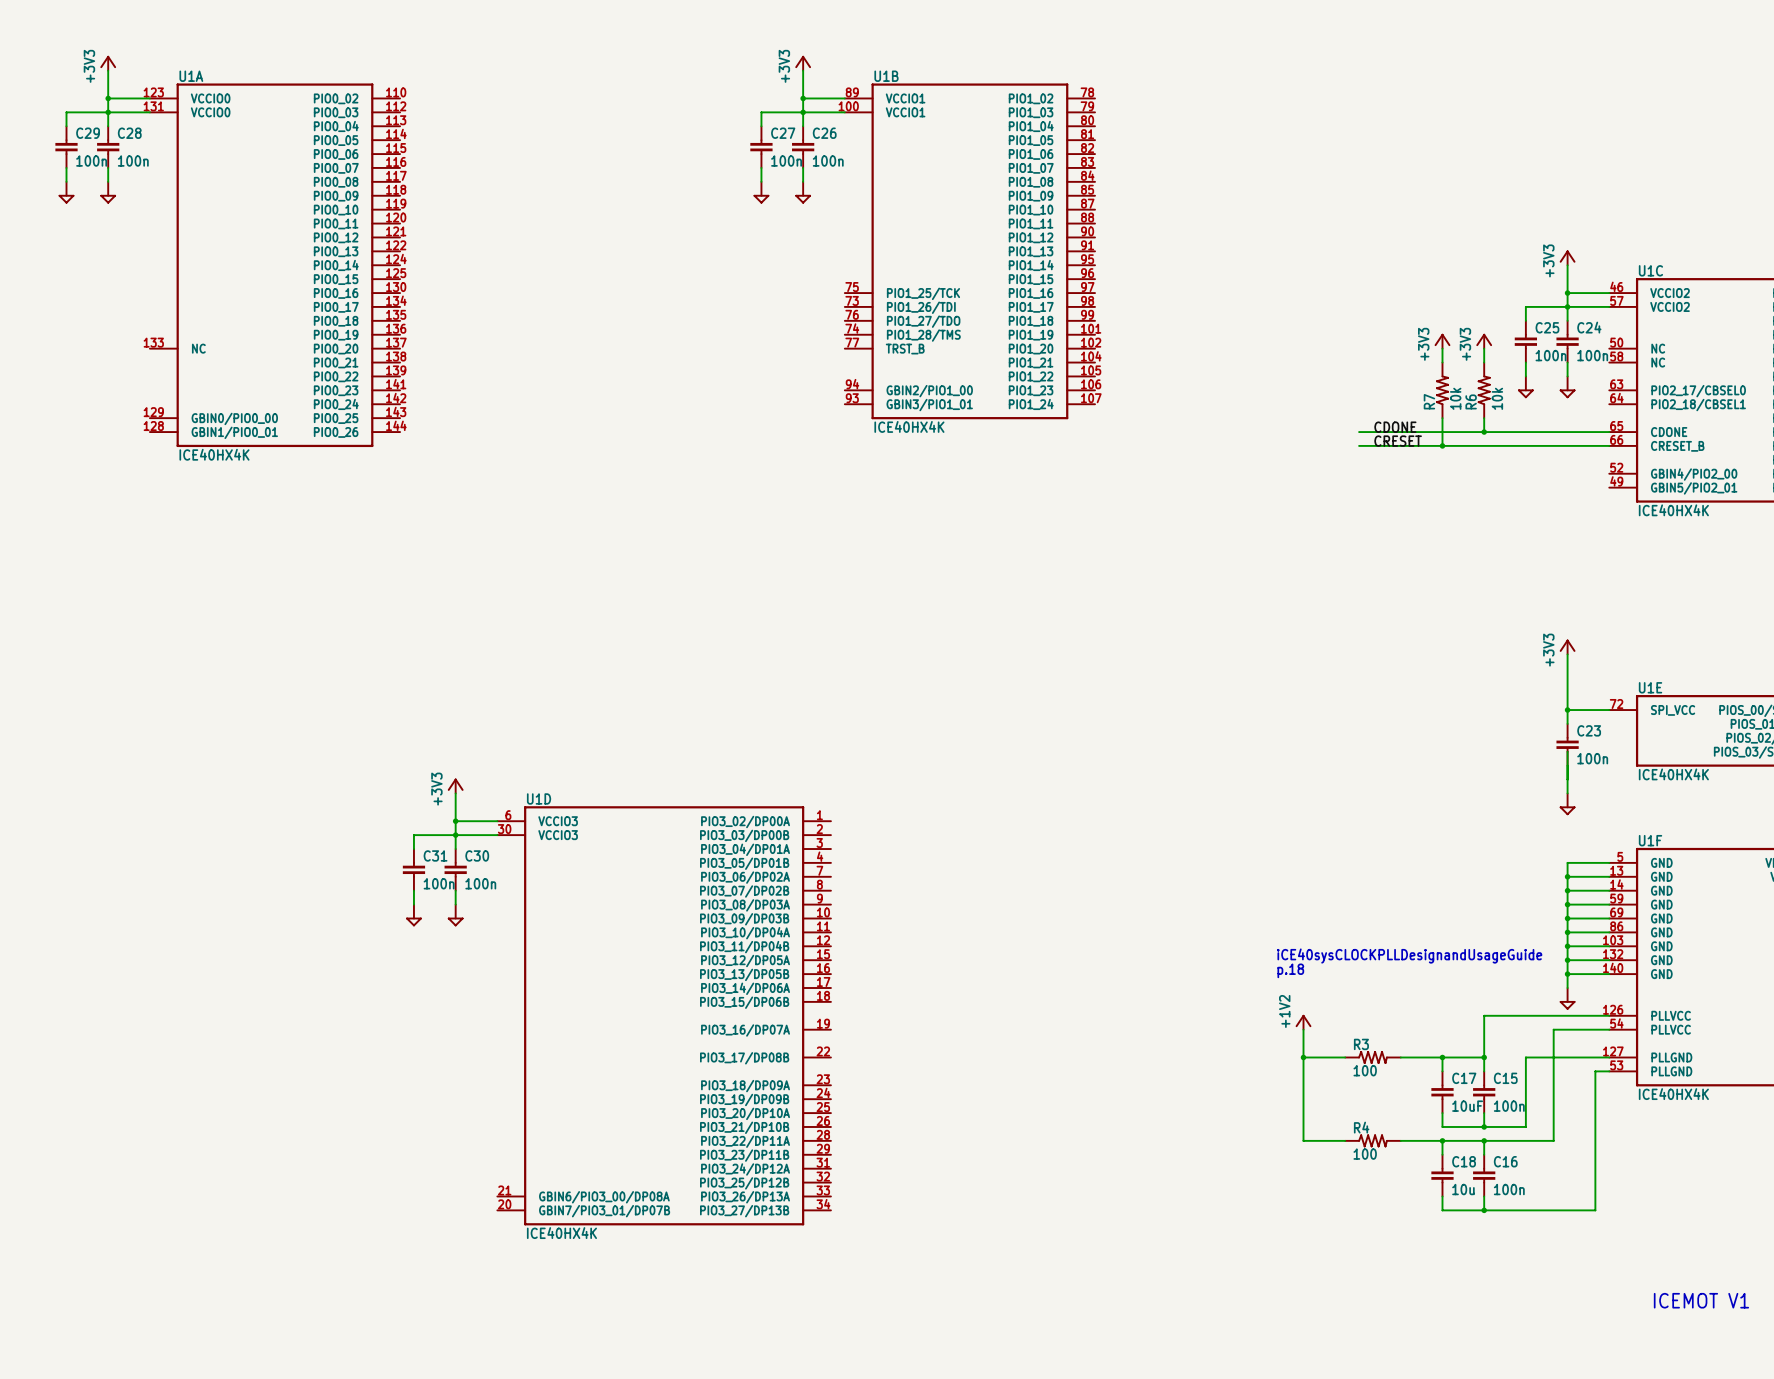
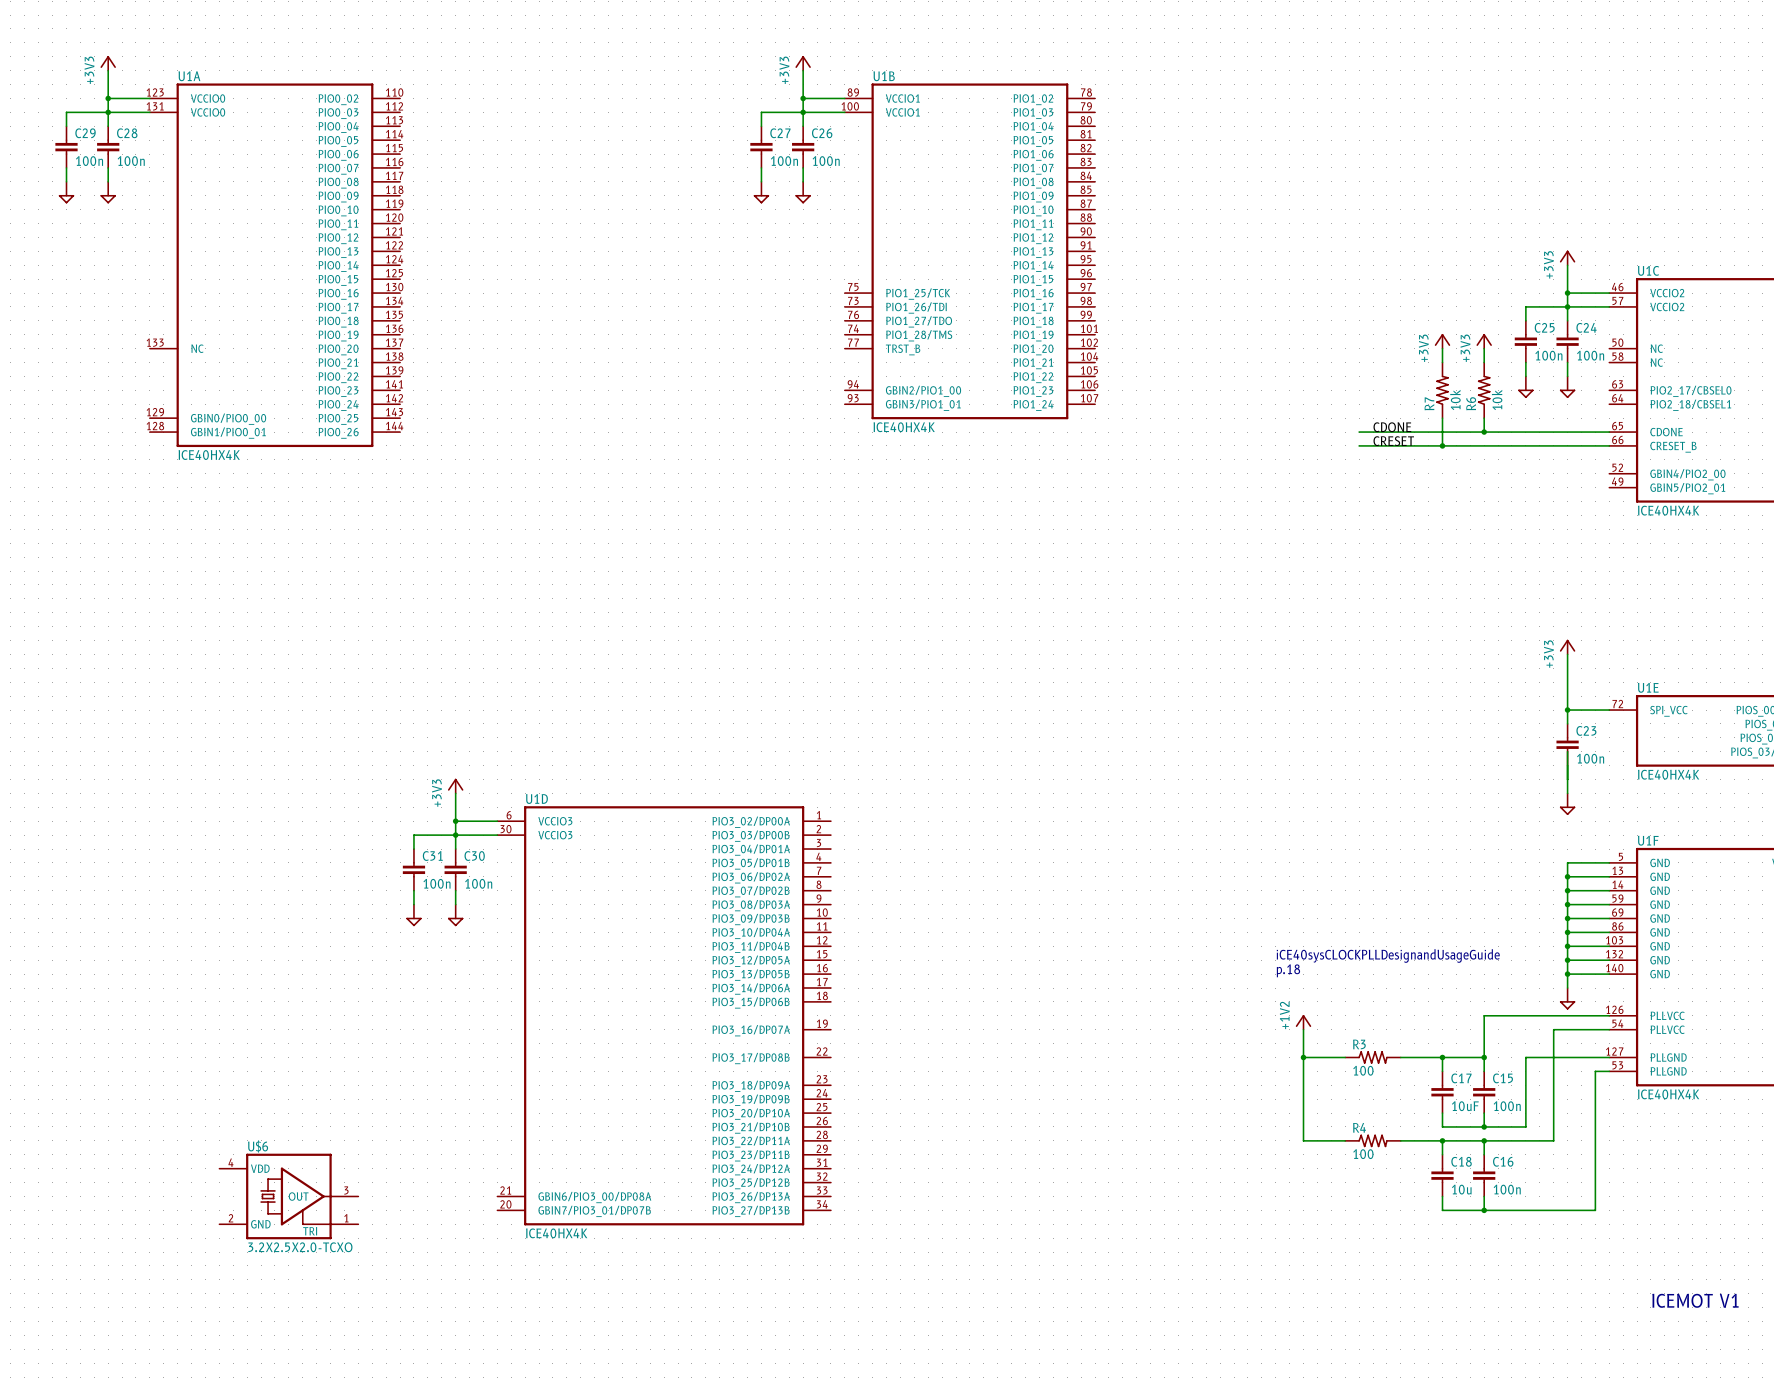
U$6: none -> 3.2X2.5X2.0-TCXO (288, 1196)

